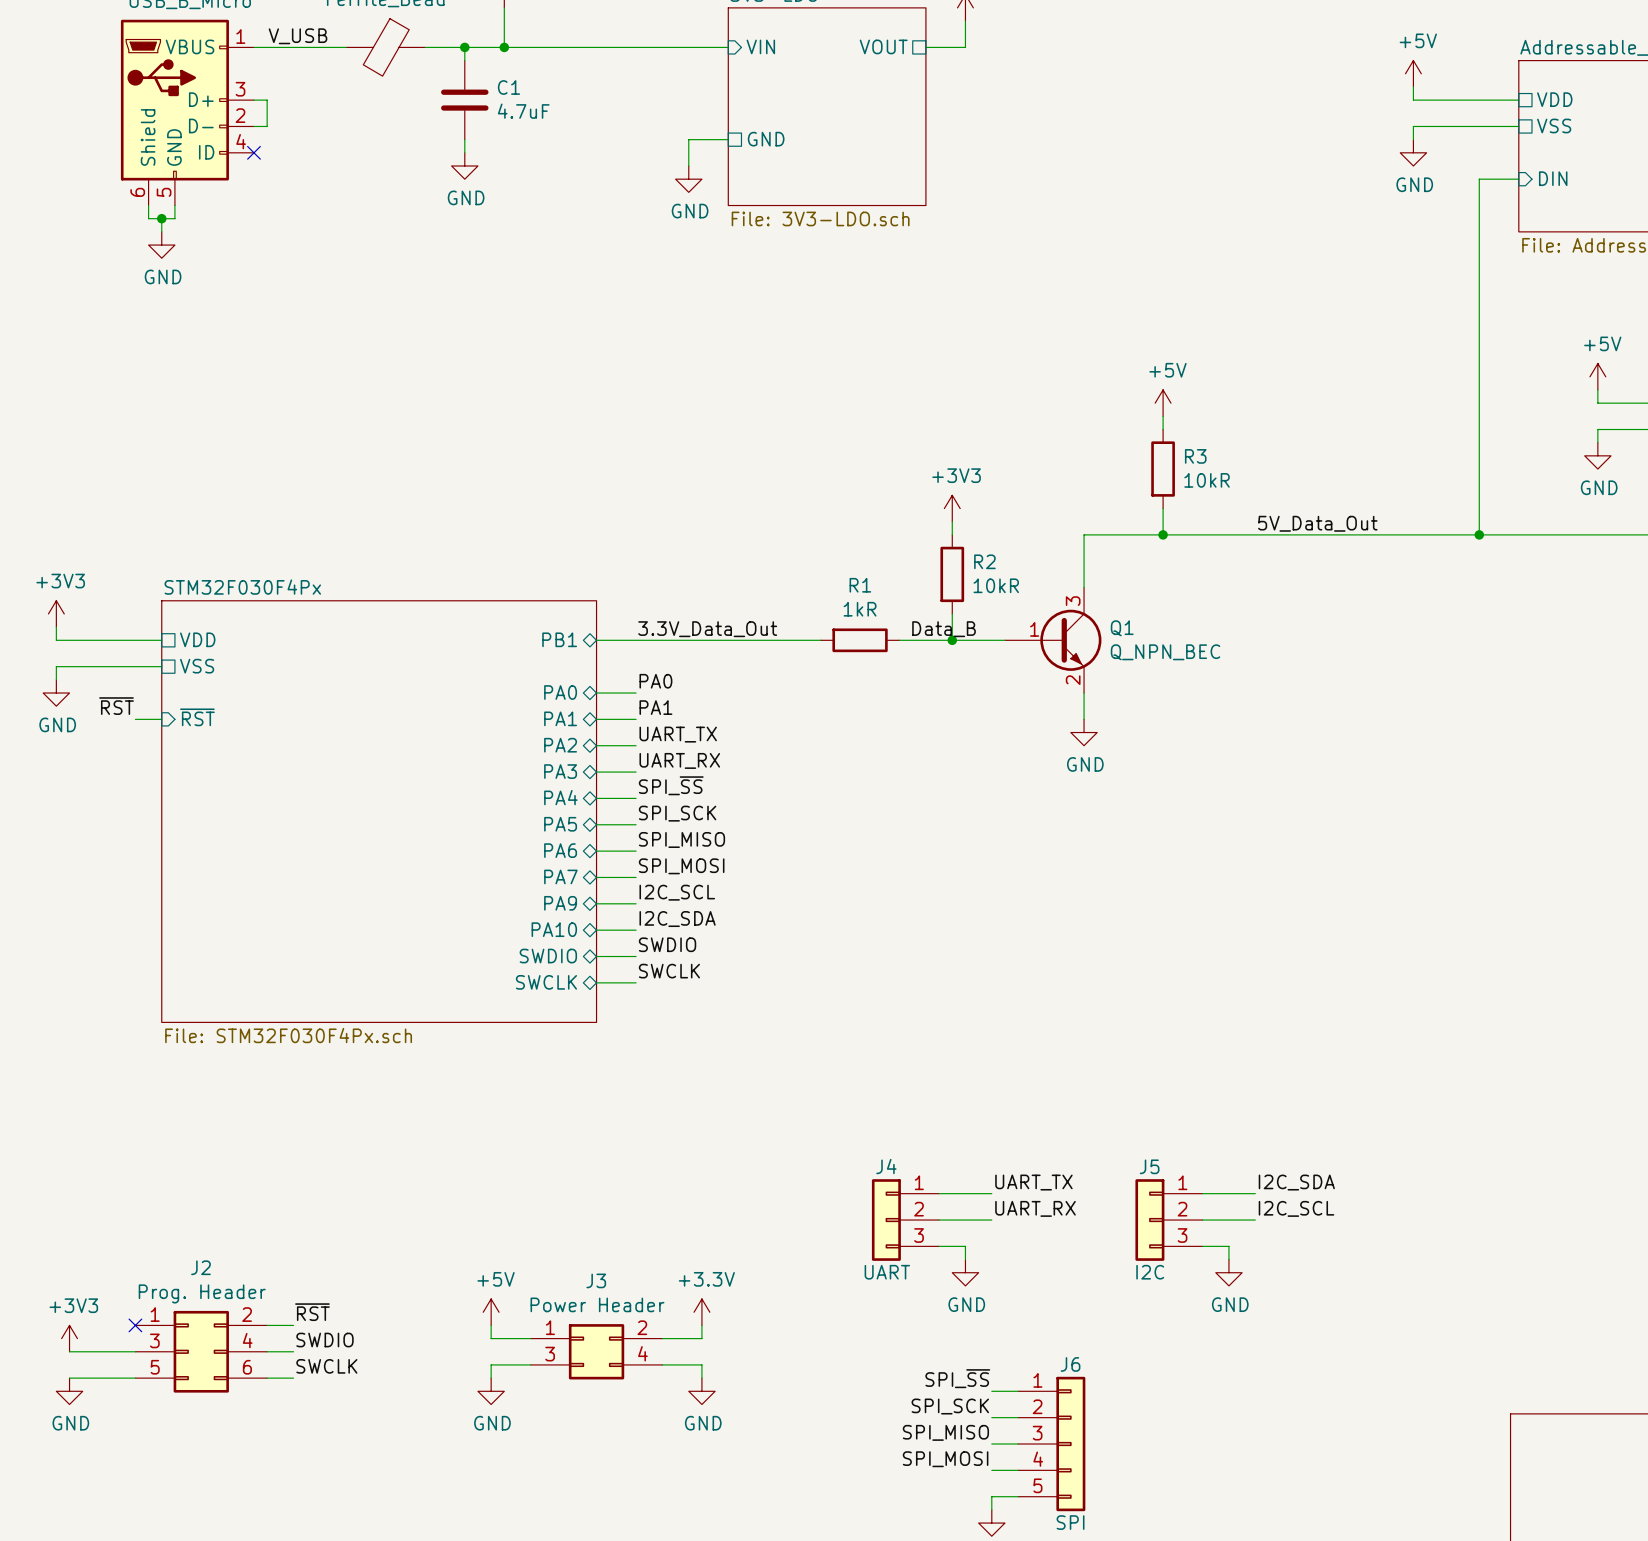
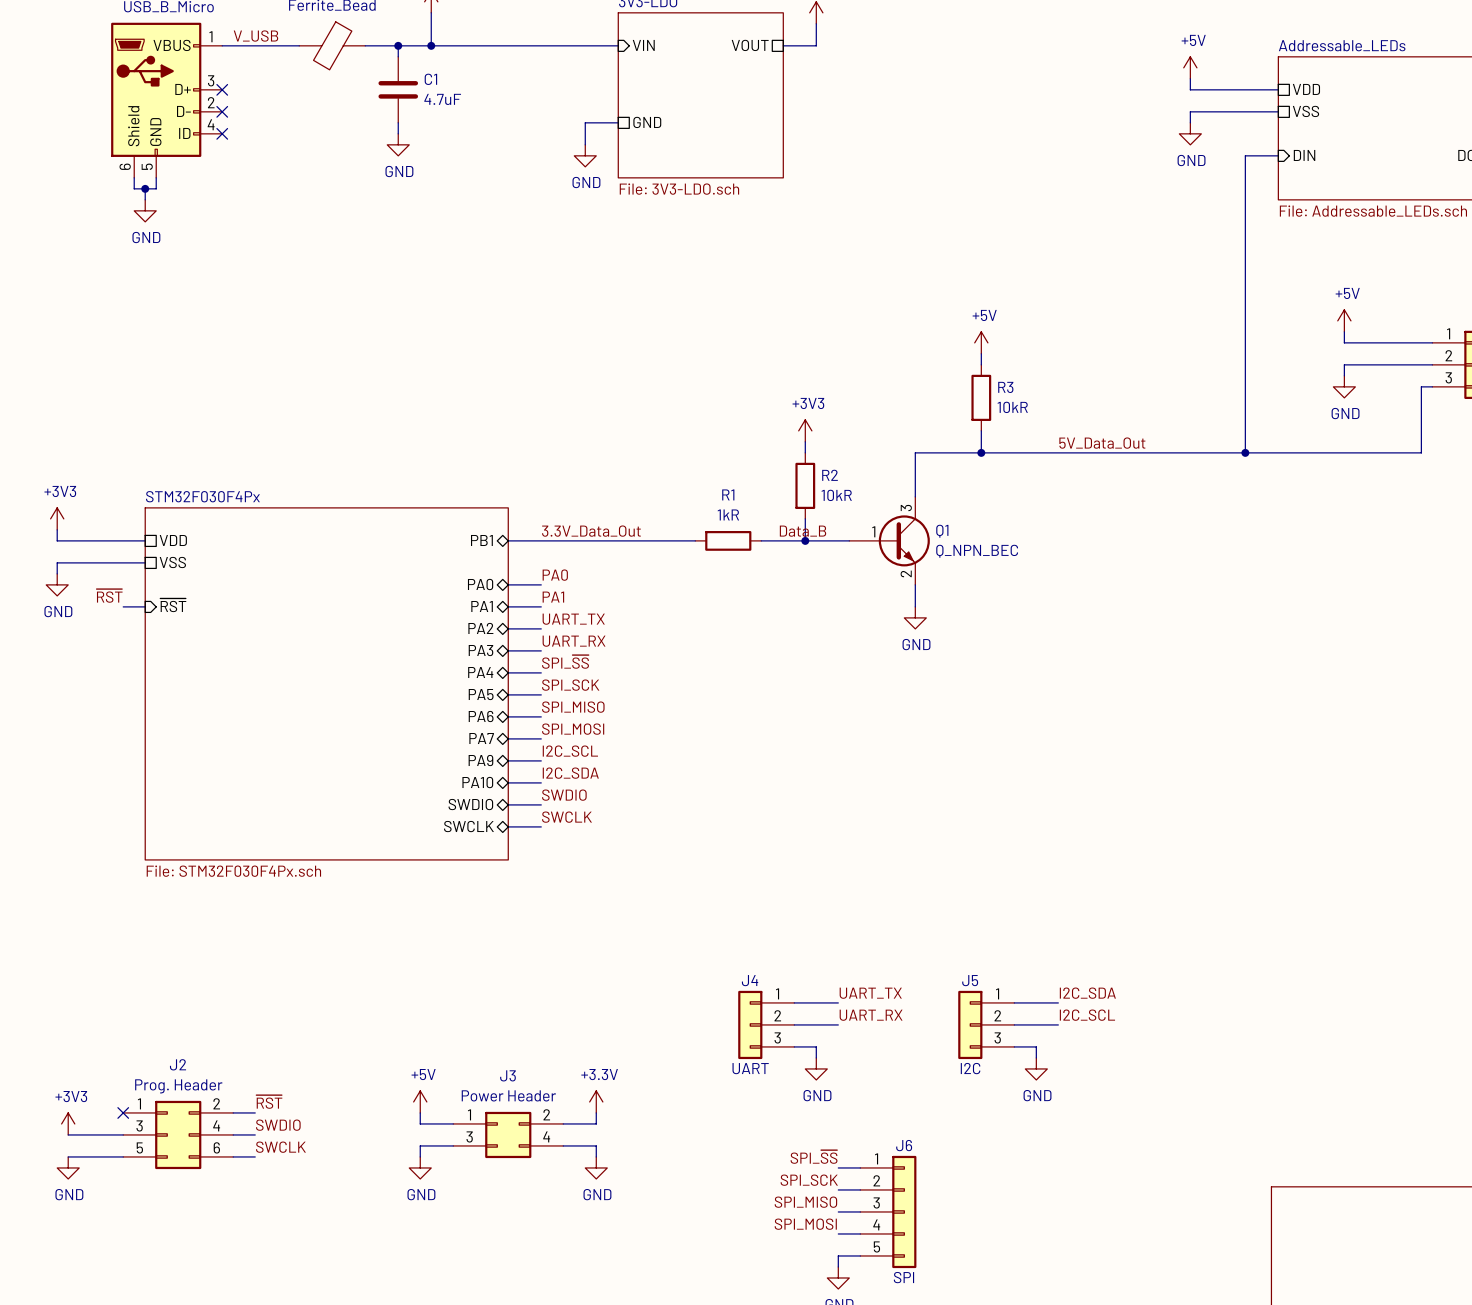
wire: (253, 100) (267, 100) (267, 126) (253, 126) -> none
no-connect mark: none -> (222, 89)
no-connect mark: none -> (222, 111)

